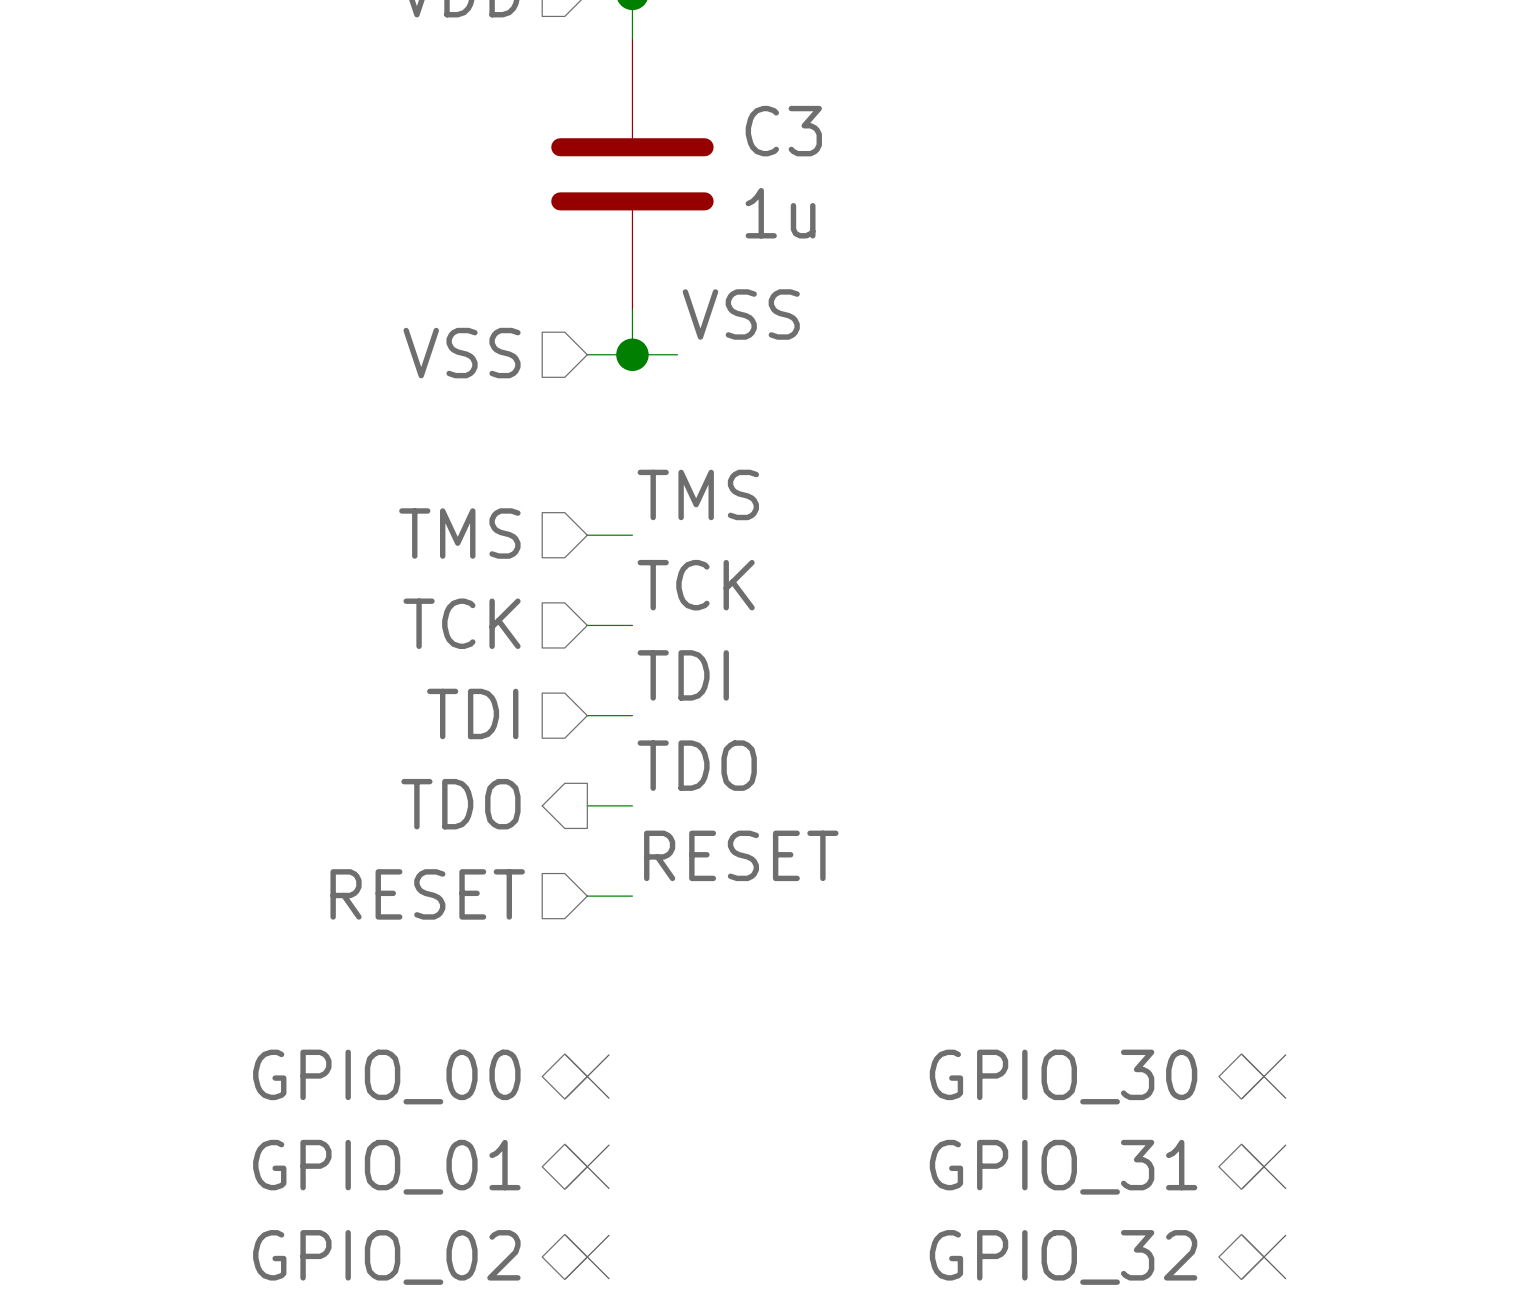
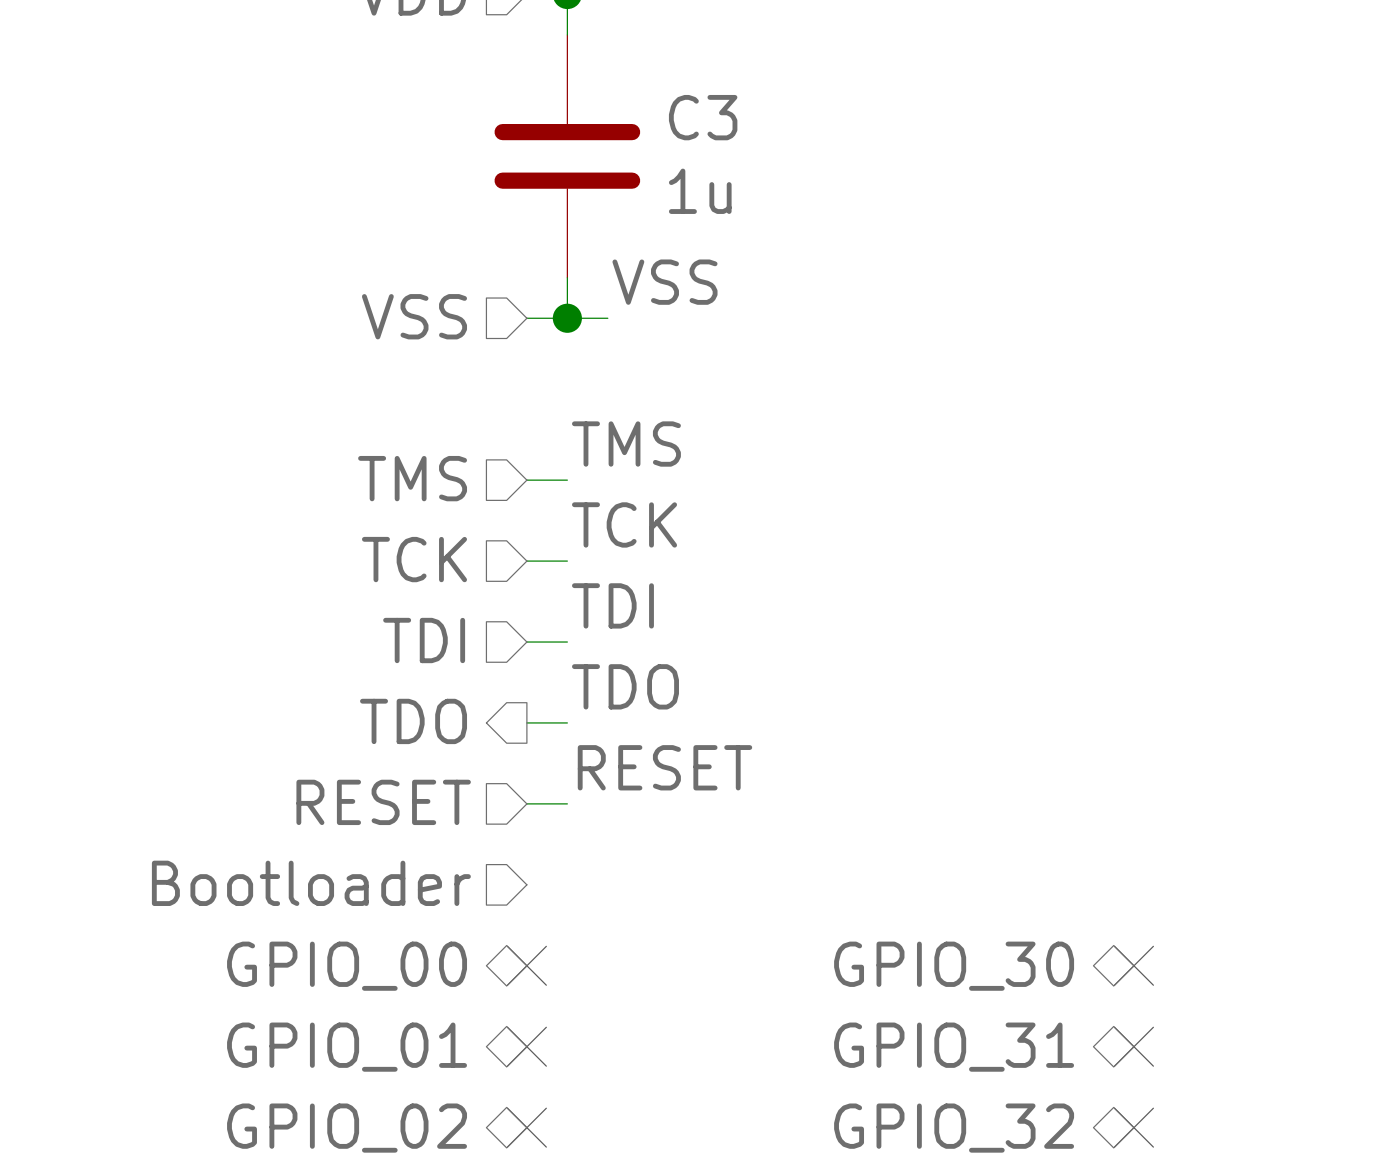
hierarchical label: none -> Bootloader (311, 883)

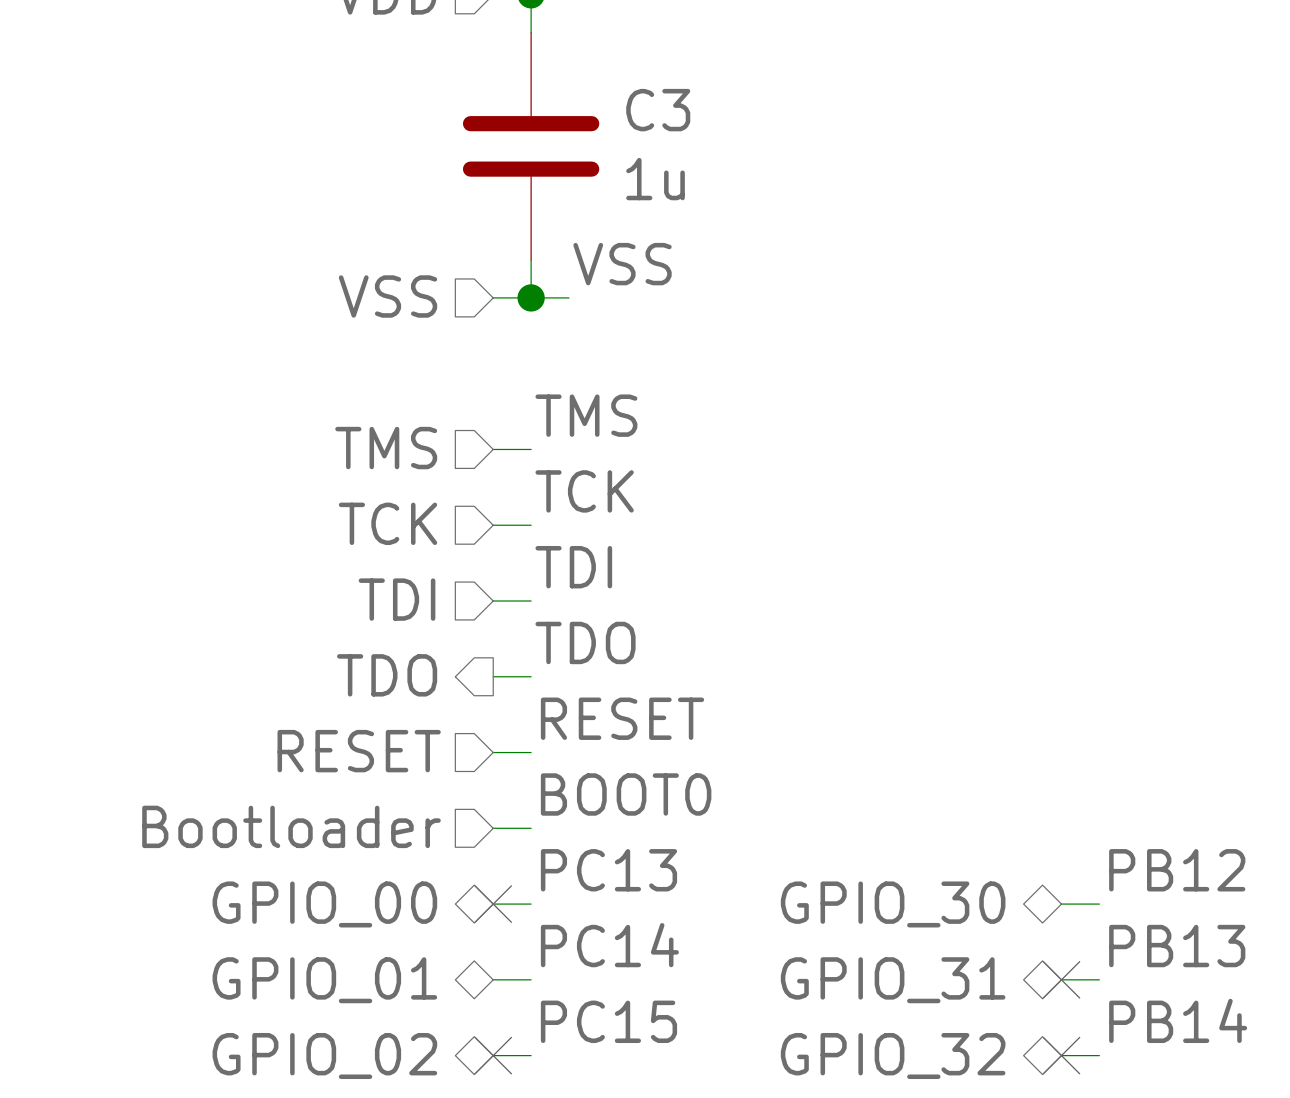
label: none -> BOOT0 (626, 794)
wire: none -> (493, 828) (531, 828)
label: none -> PC13 (608, 870)
label: none -> PB12 (1177, 870)
wire: none -> (493, 904) (531, 904)
wire: none -> (1061, 904) (1099, 904)
no-connect mark: (1133, 965) -> none
label: none -> PC14 (609, 945)
label: none -> PB13 (1177, 946)
wire: none -> (493, 979) (531, 979)
no-connect mark: (526, 1046) -> none
wire: none -> (1061, 979) (1099, 979)
label: none -> PB14 (1178, 1020)
label: none -> PC15 (608, 1021)
wire: none -> (493, 1055) (531, 1055)
wire: none -> (1061, 1055) (1099, 1055)

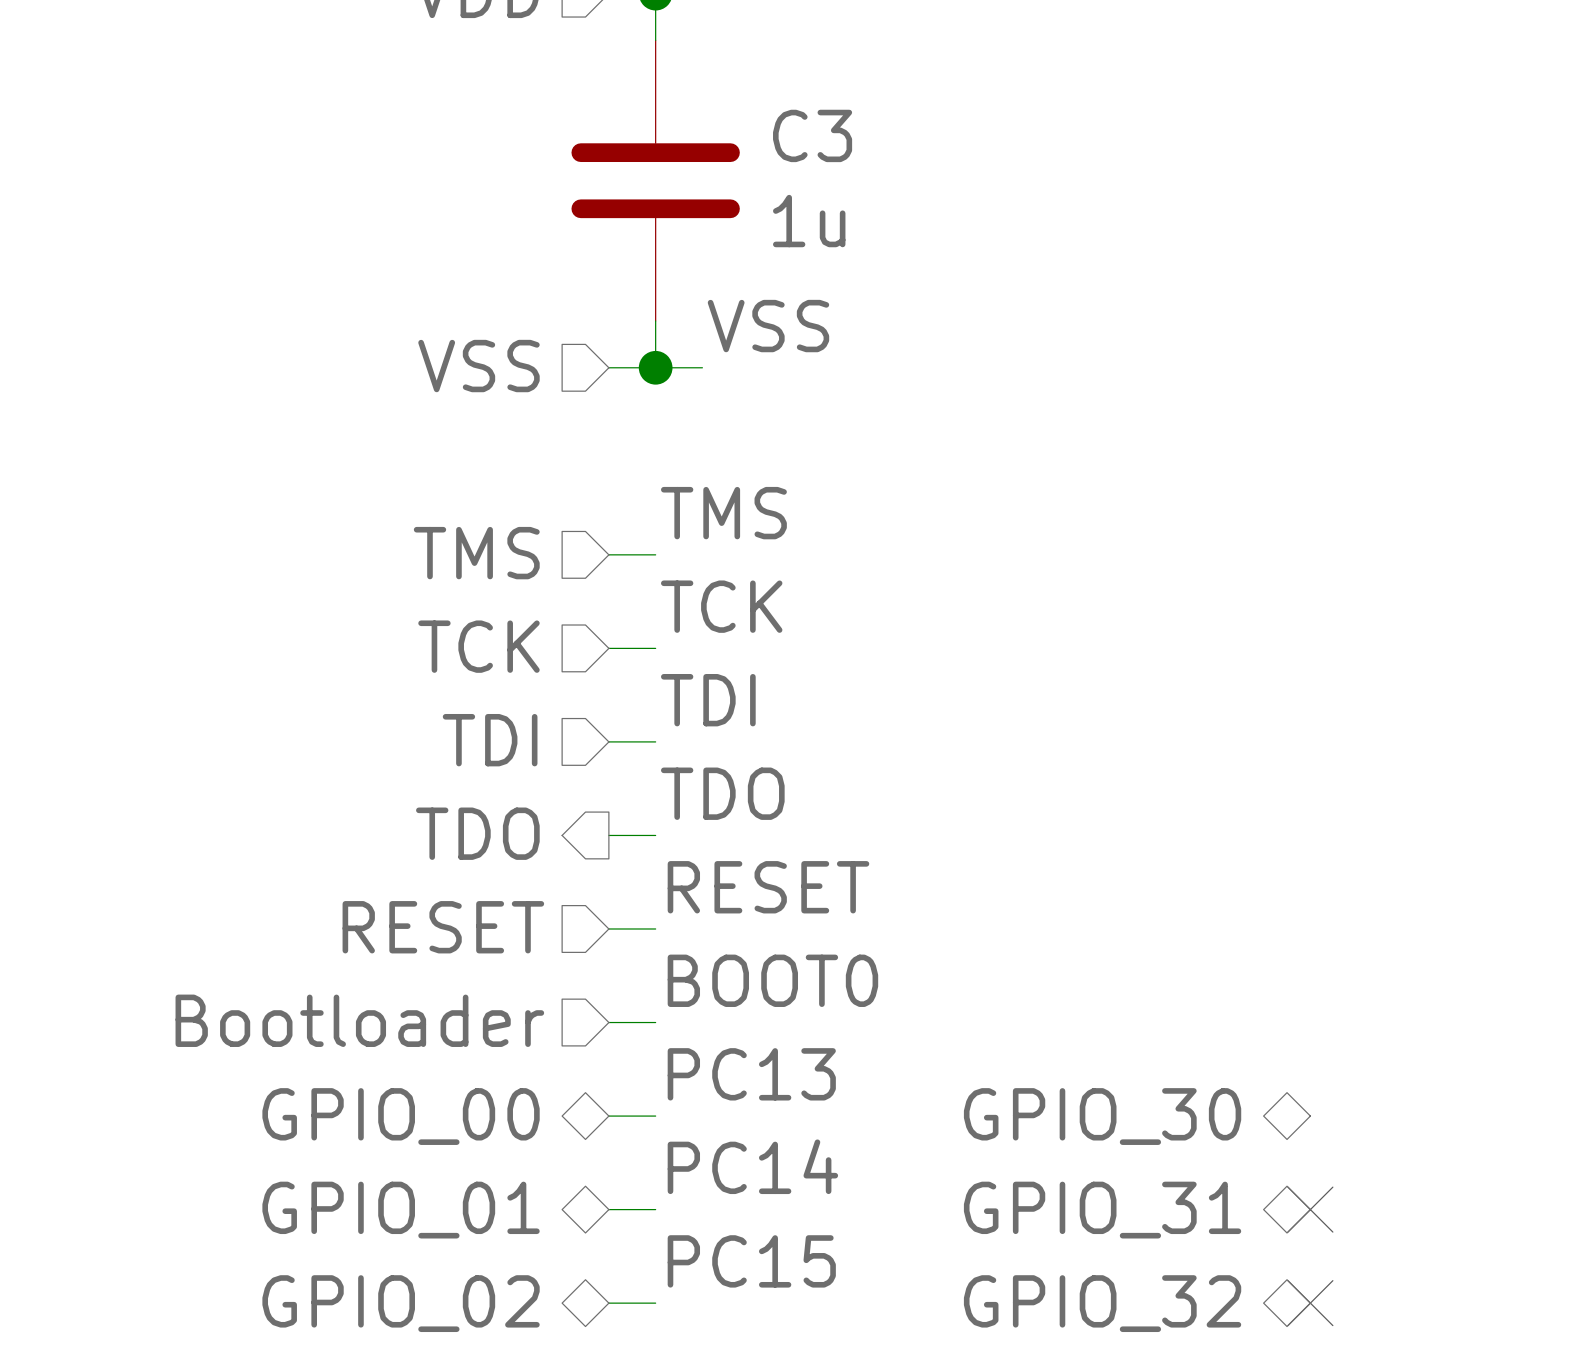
label: PB12 (1177, 870) -> none
no-connect mark: (493, 904) -> none
wire: (1061, 904) (1099, 904) -> none
label: PB13 (1177, 946) -> none
wire: (1061, 979) (1099, 979) -> none
label: PB14 (1178, 1020) -> none
no-connect mark: (493, 1055) -> none
wire: (1061, 1055) (1099, 1055) -> none

